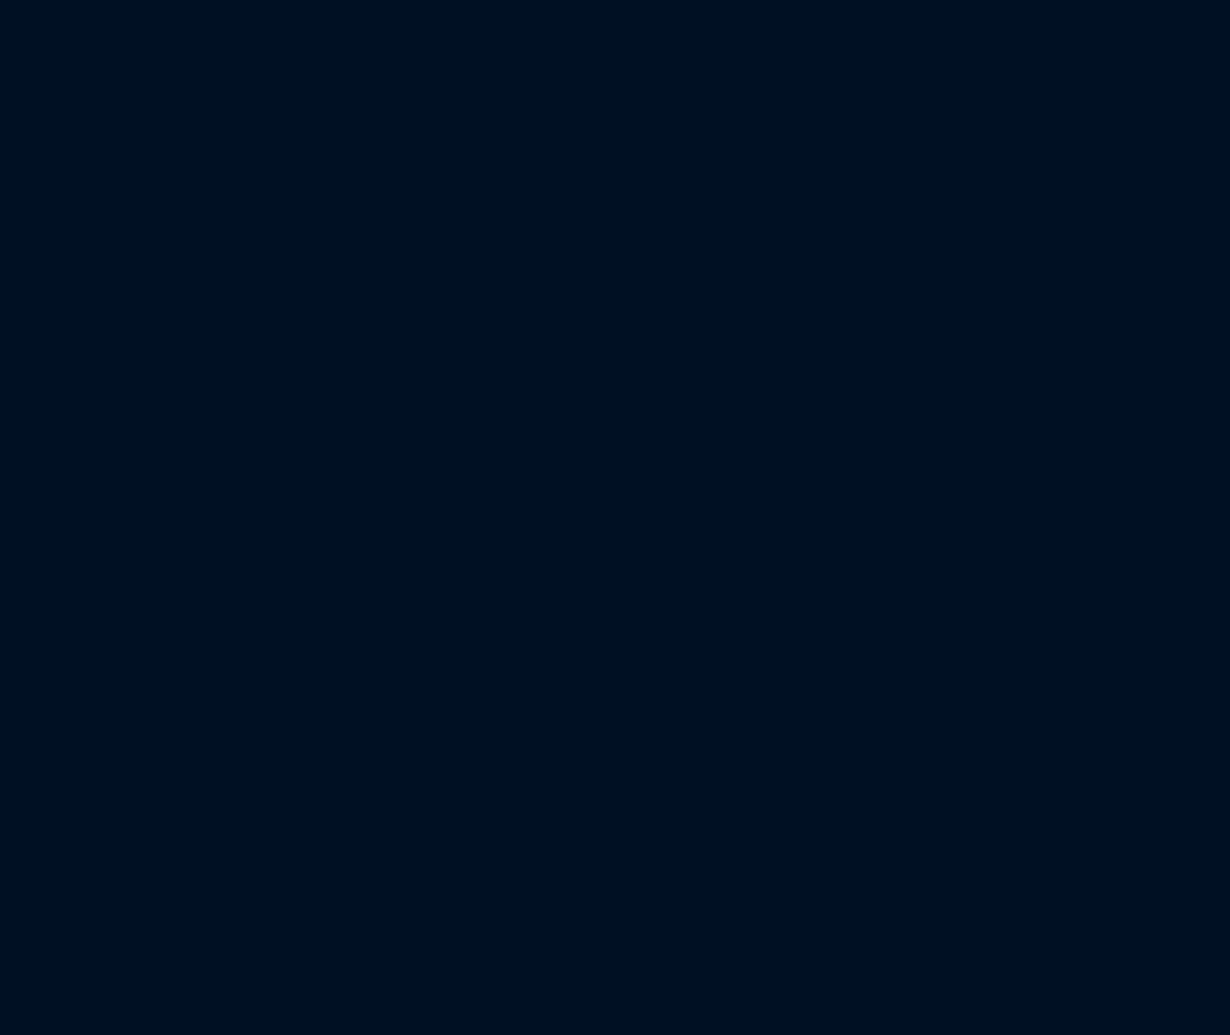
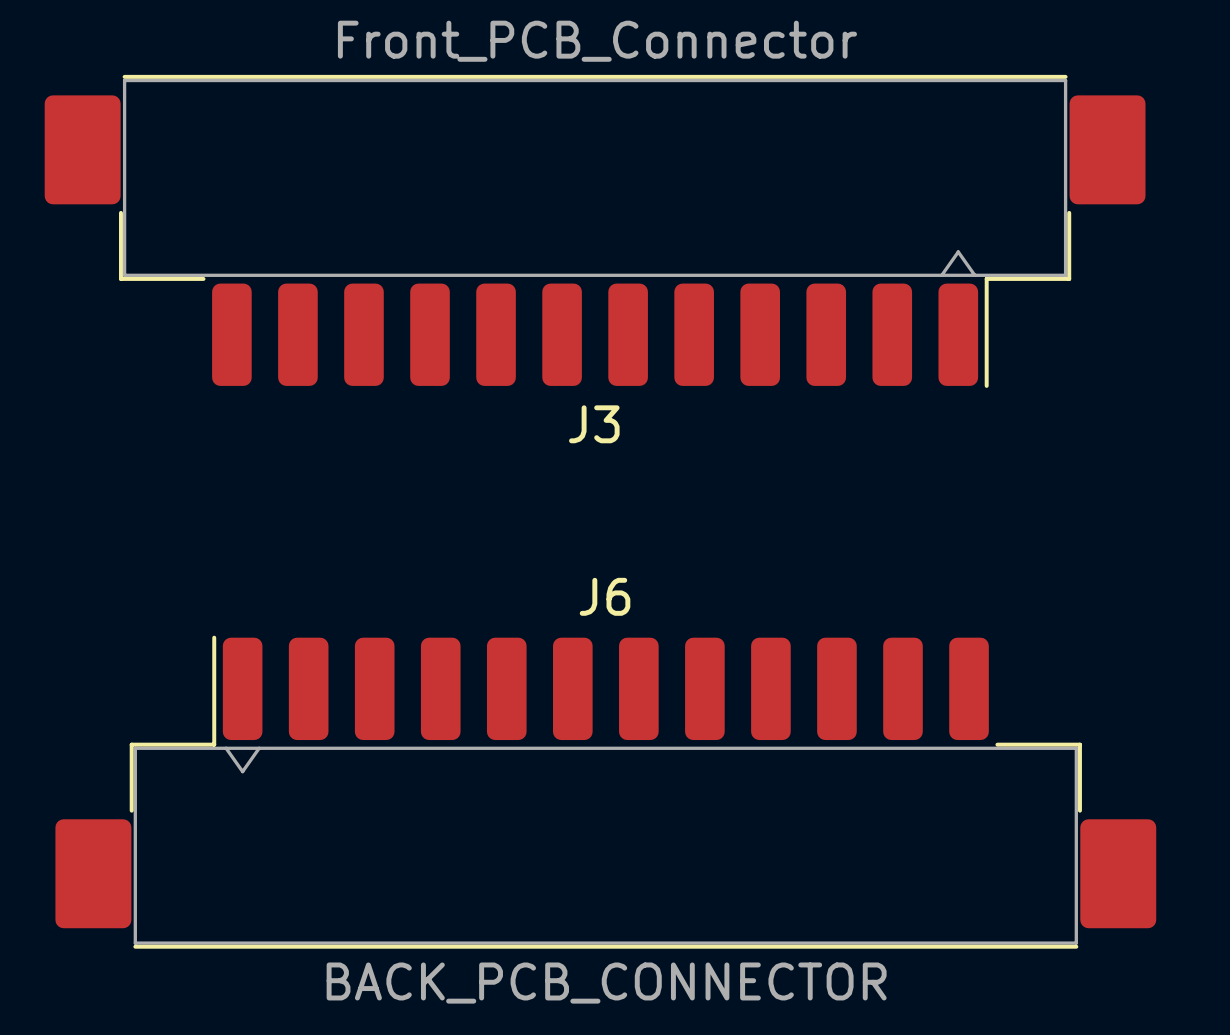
J3: none -> Front_PCB_Connector (595, 231)
J6: none -> BACK_PCB_CONNECTOR (605, 792)

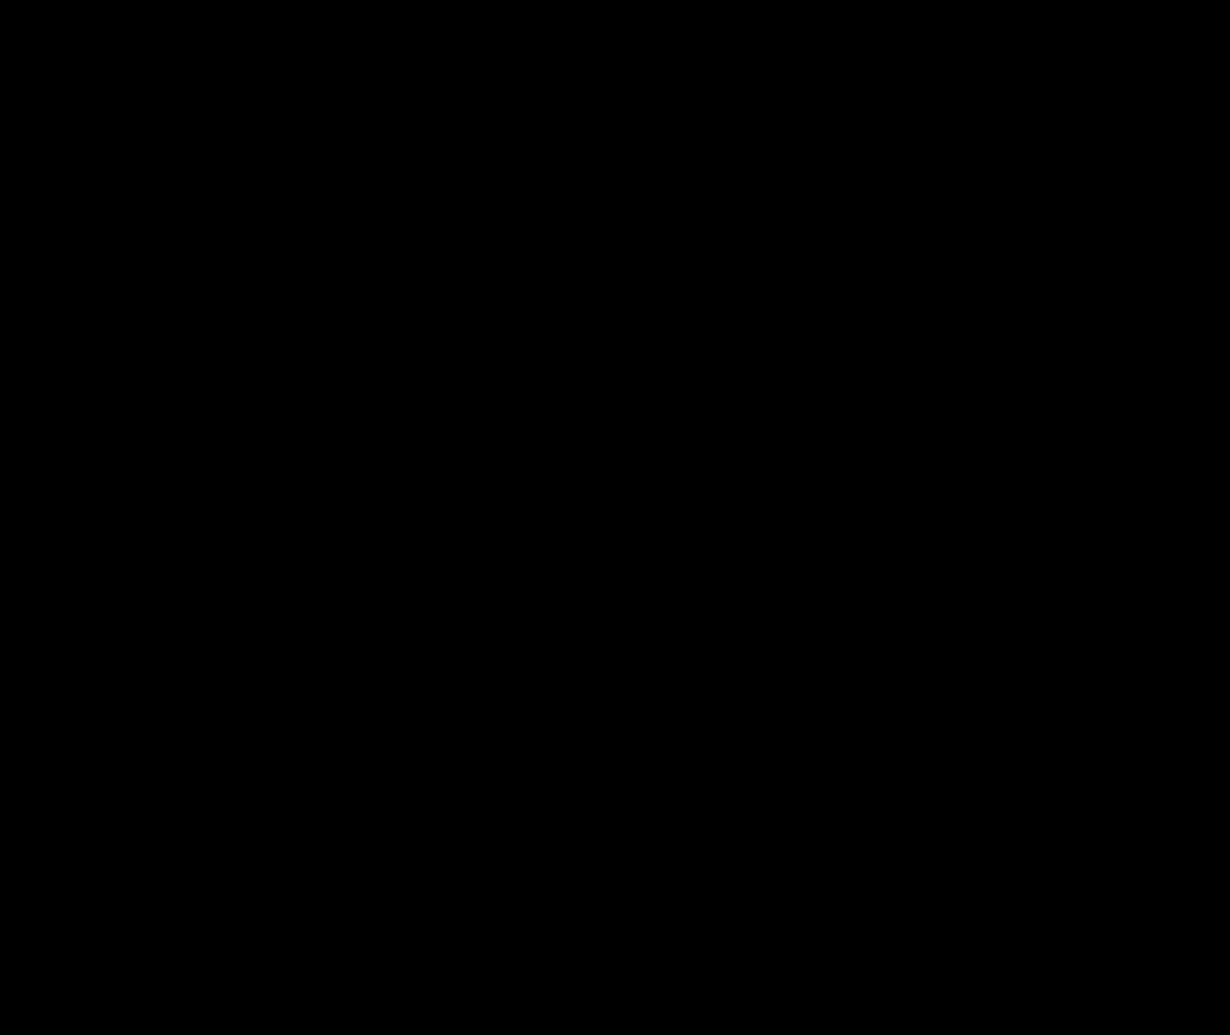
J3: Front_PCB_Connector (595, 231) -> none
J6: BACK_PCB_CONNECTOR (605, 792) -> none

